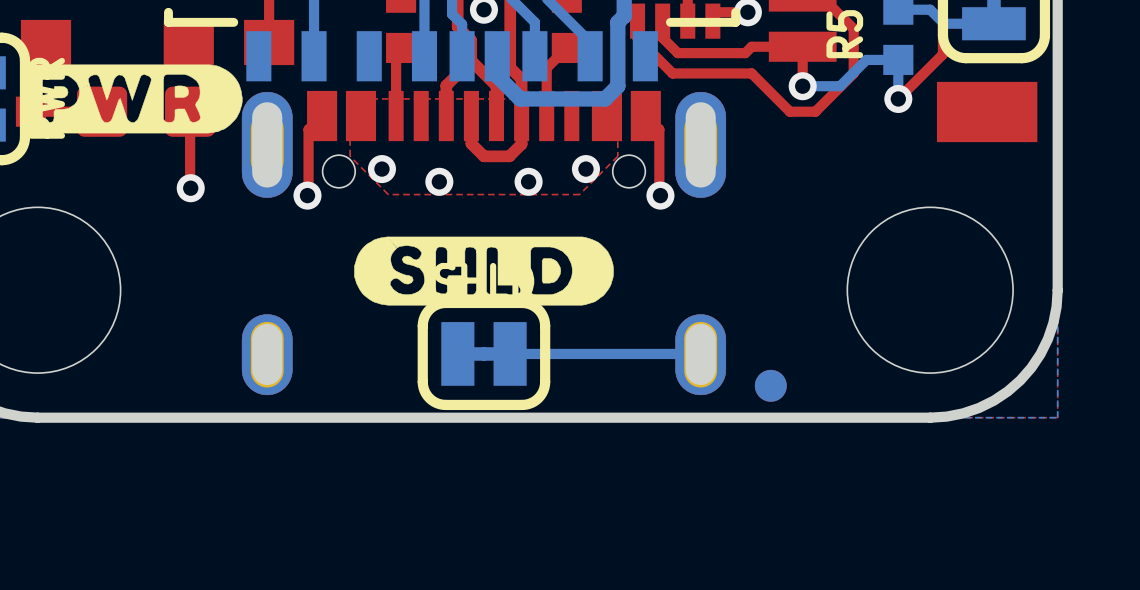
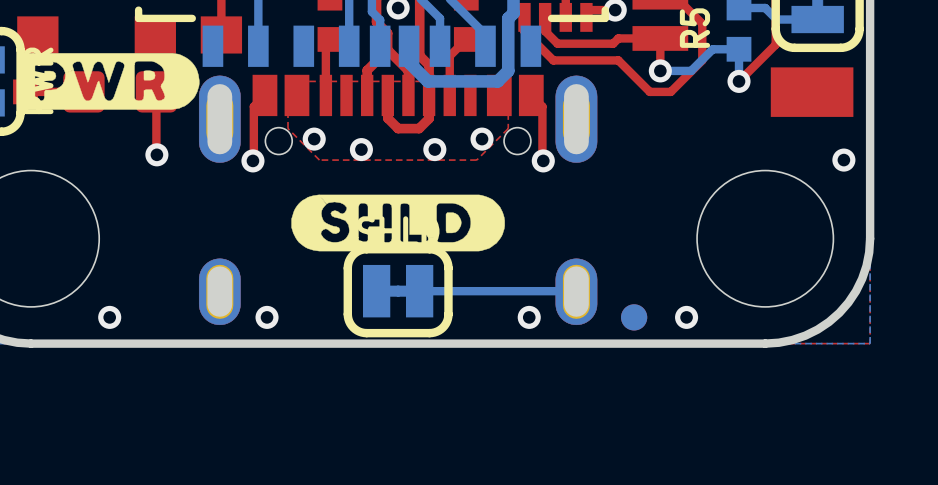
via: none -> (843, 160)
via: none -> (109, 317)
via: none -> (267, 317)
via: none -> (529, 317)
via: none -> (686, 317)

